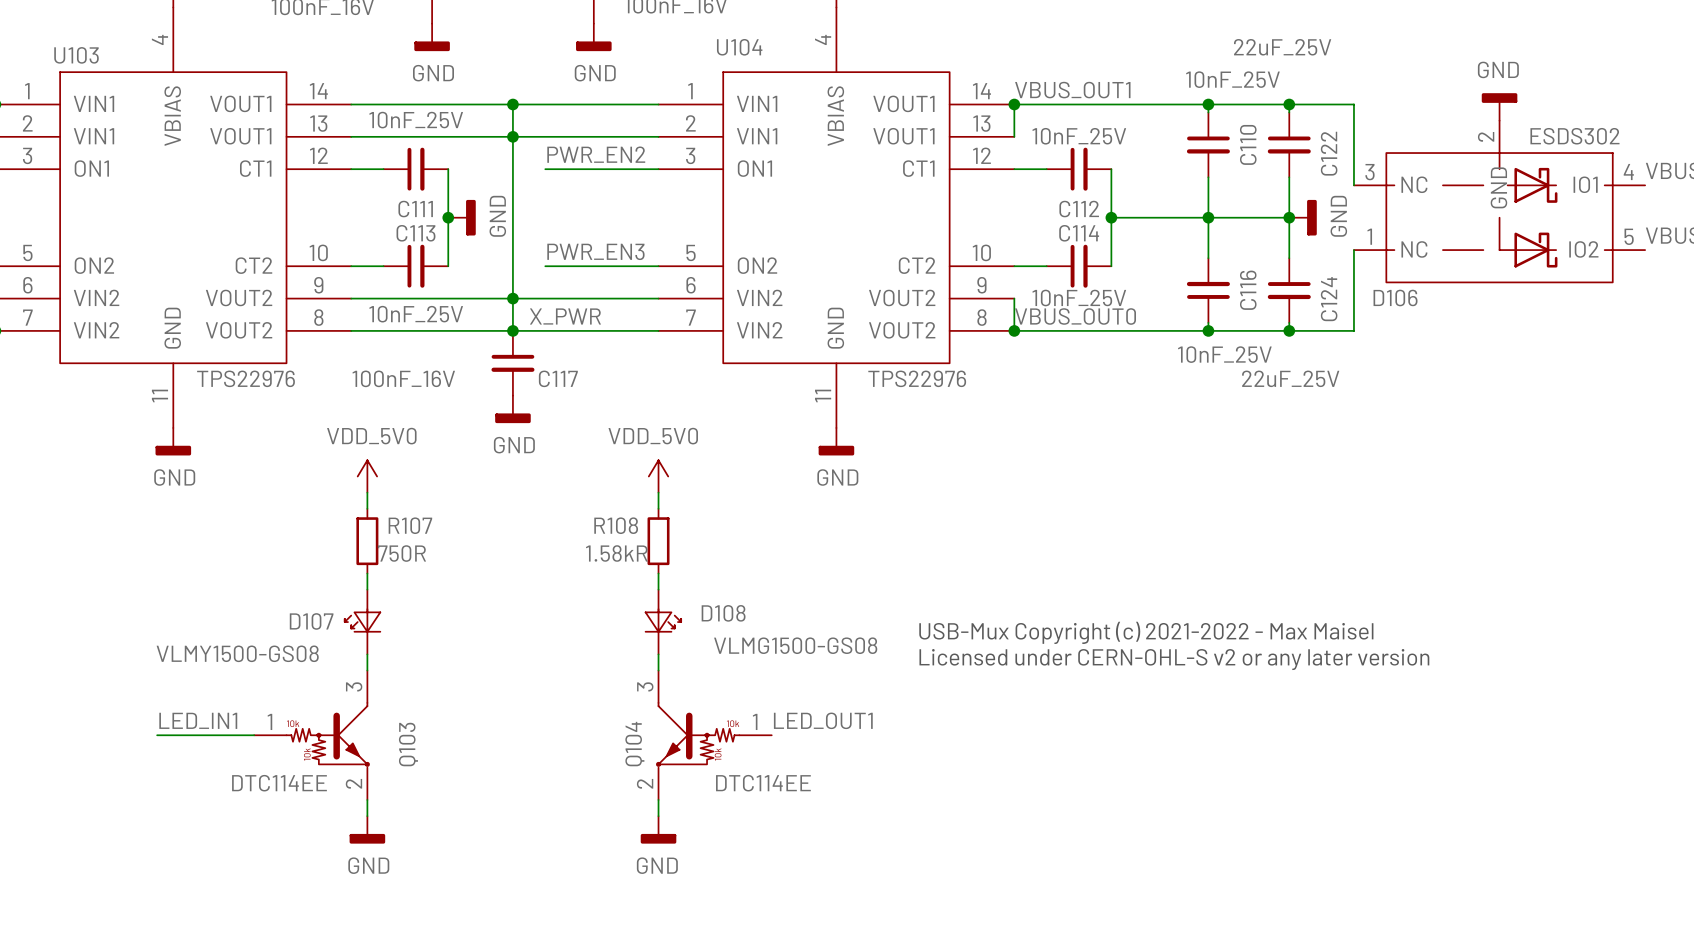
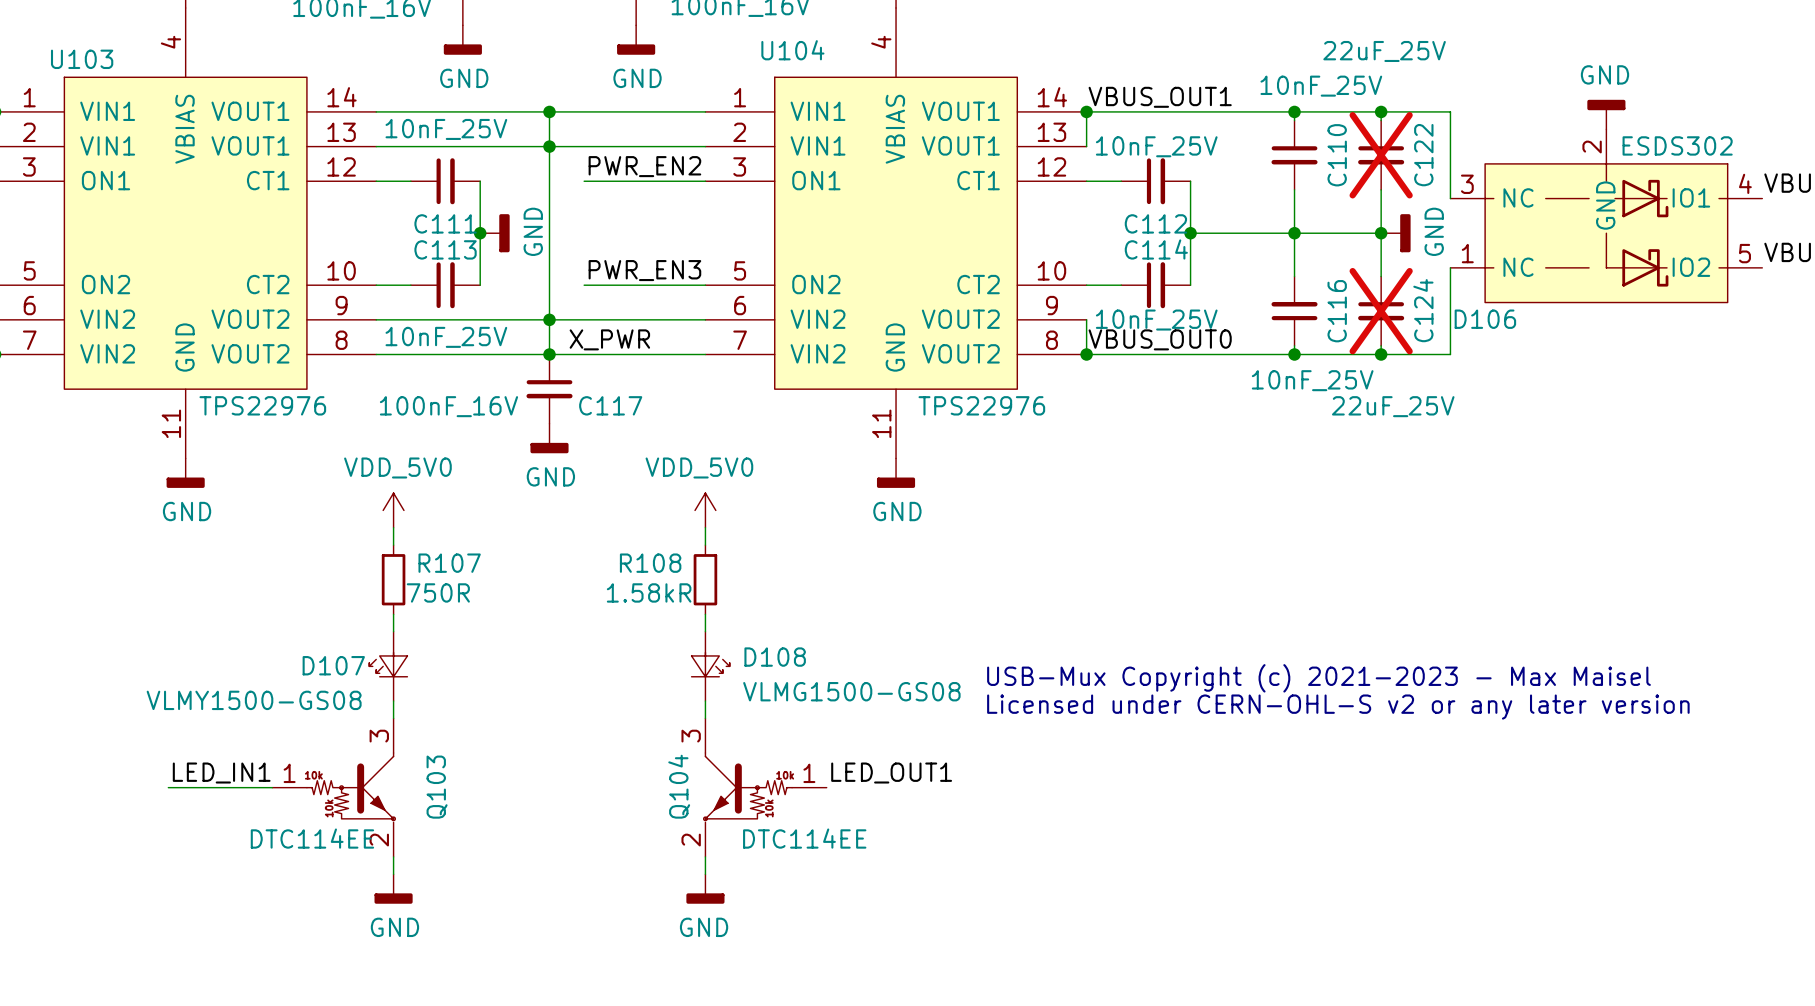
C122 do-not-place cross: none -> (1381, 155)
C124 do-not-place cross: none -> (1381, 311)
text: USB-Mux Copyright (c) 2021-2022 - Max Maisel (1146, 632) -> USB-Mux Copyright (c) 2021-2023 - Max Maisel (1318, 678)

